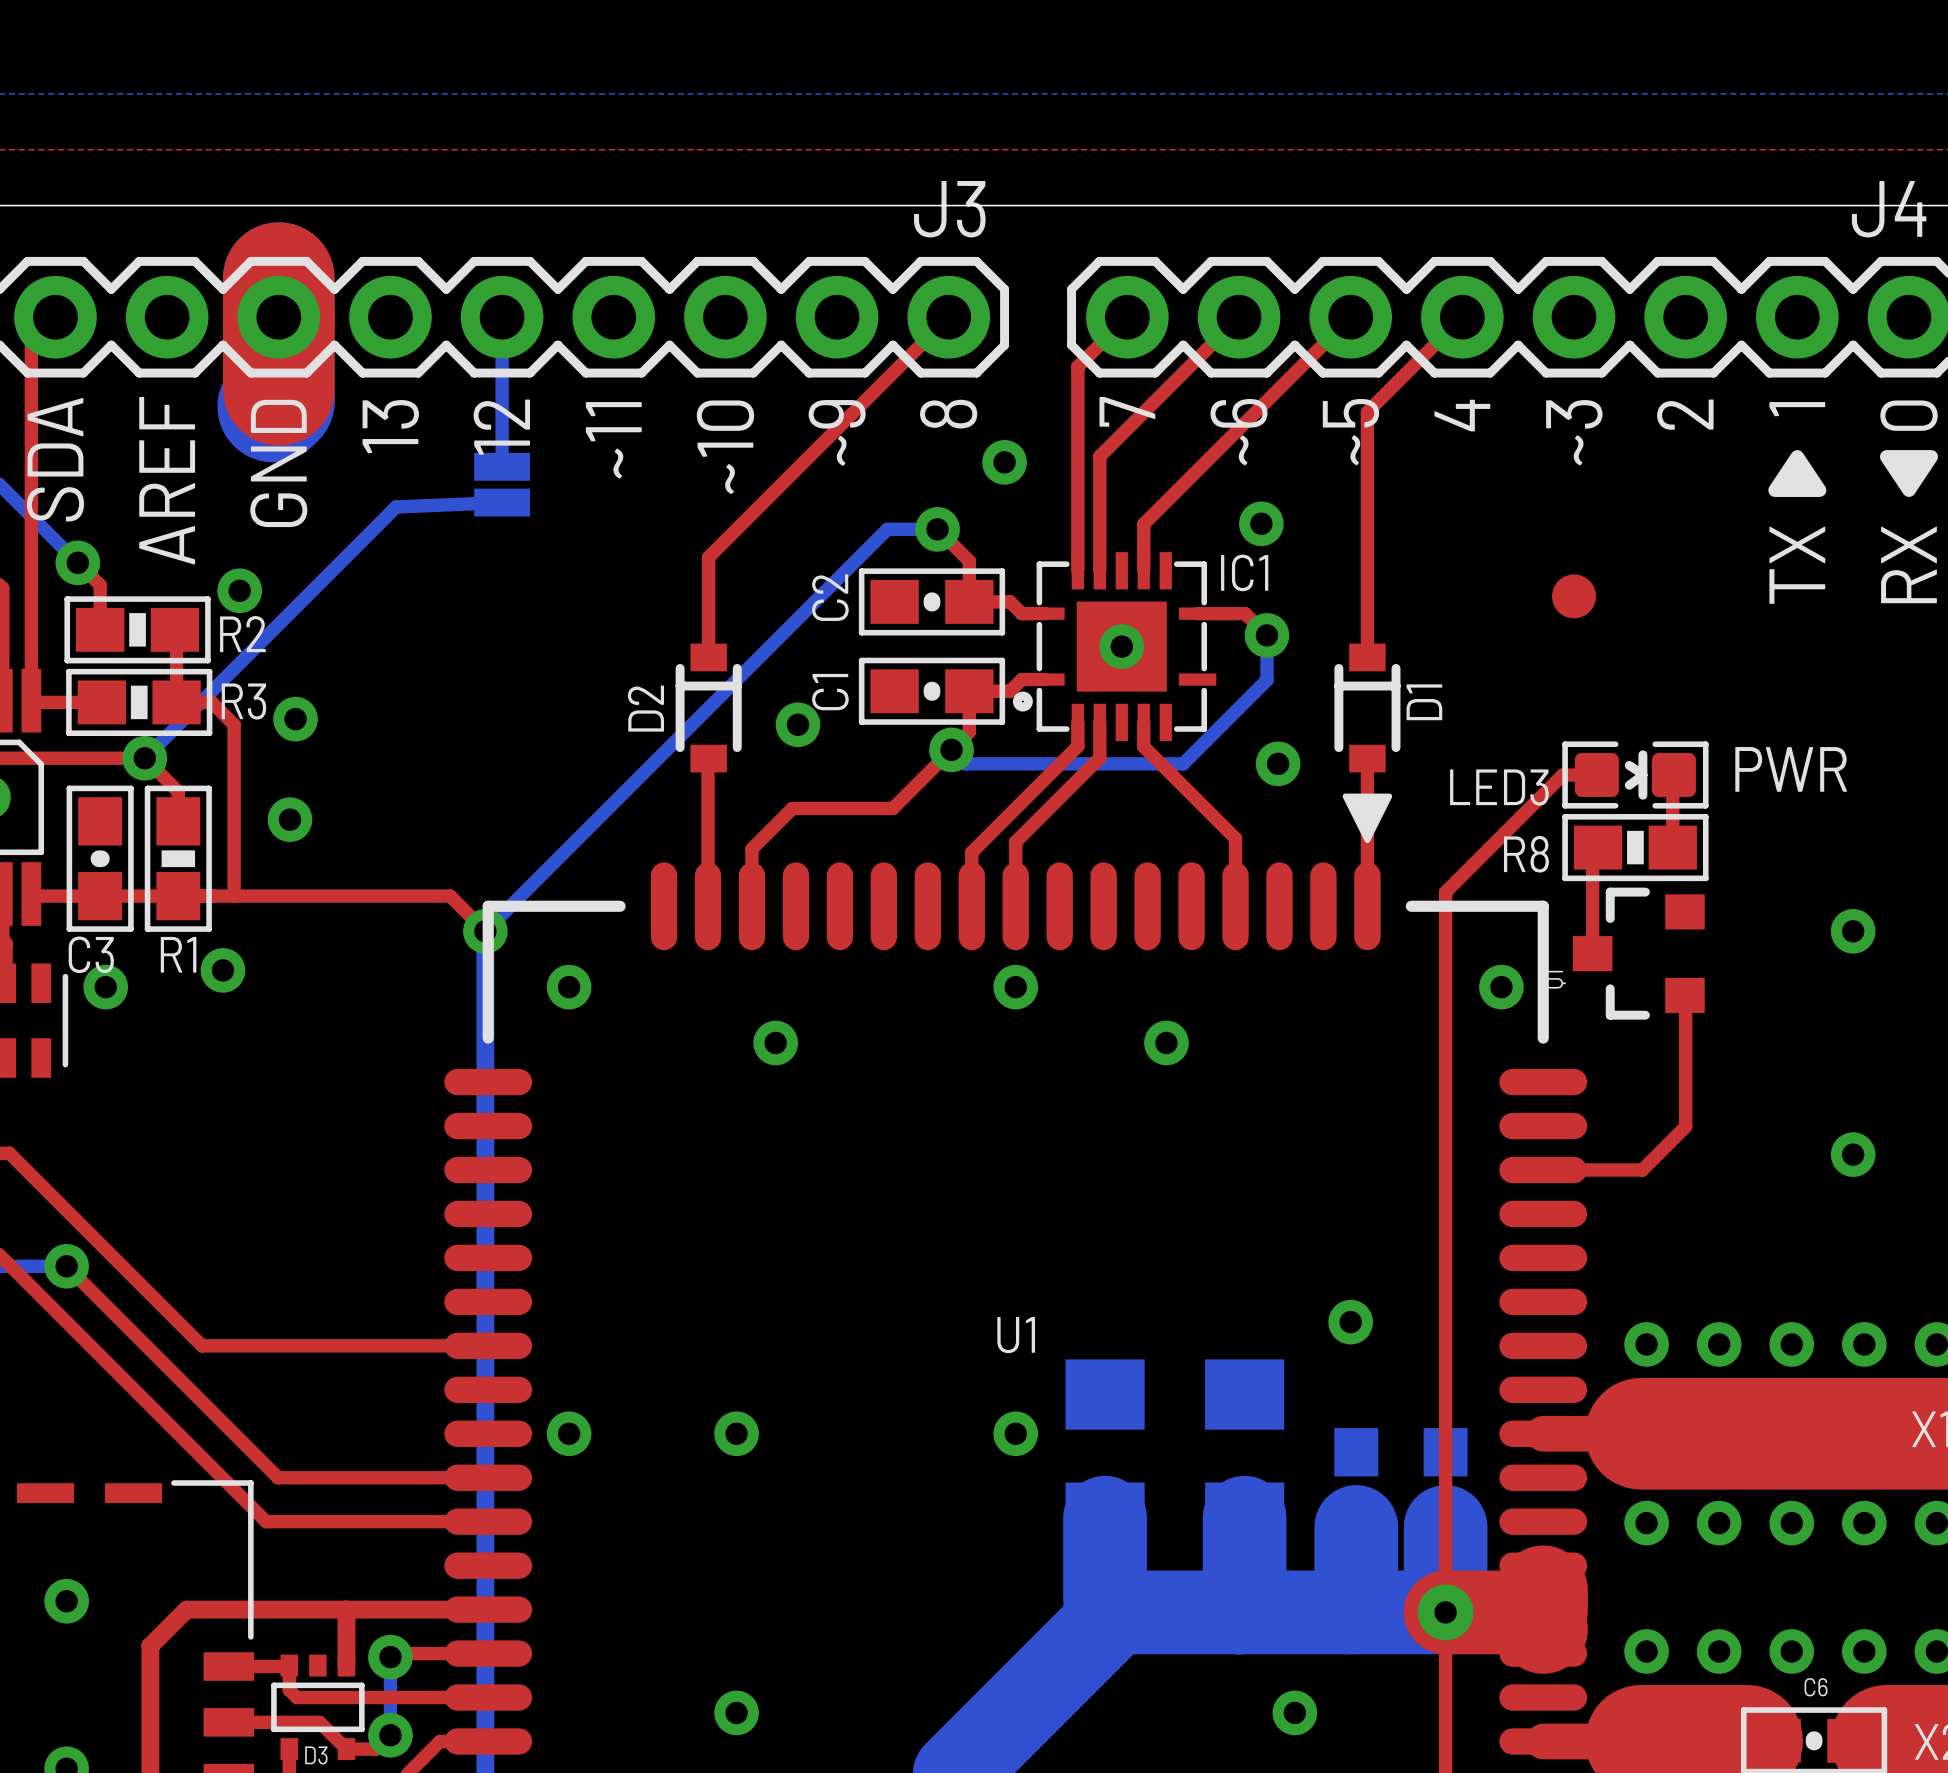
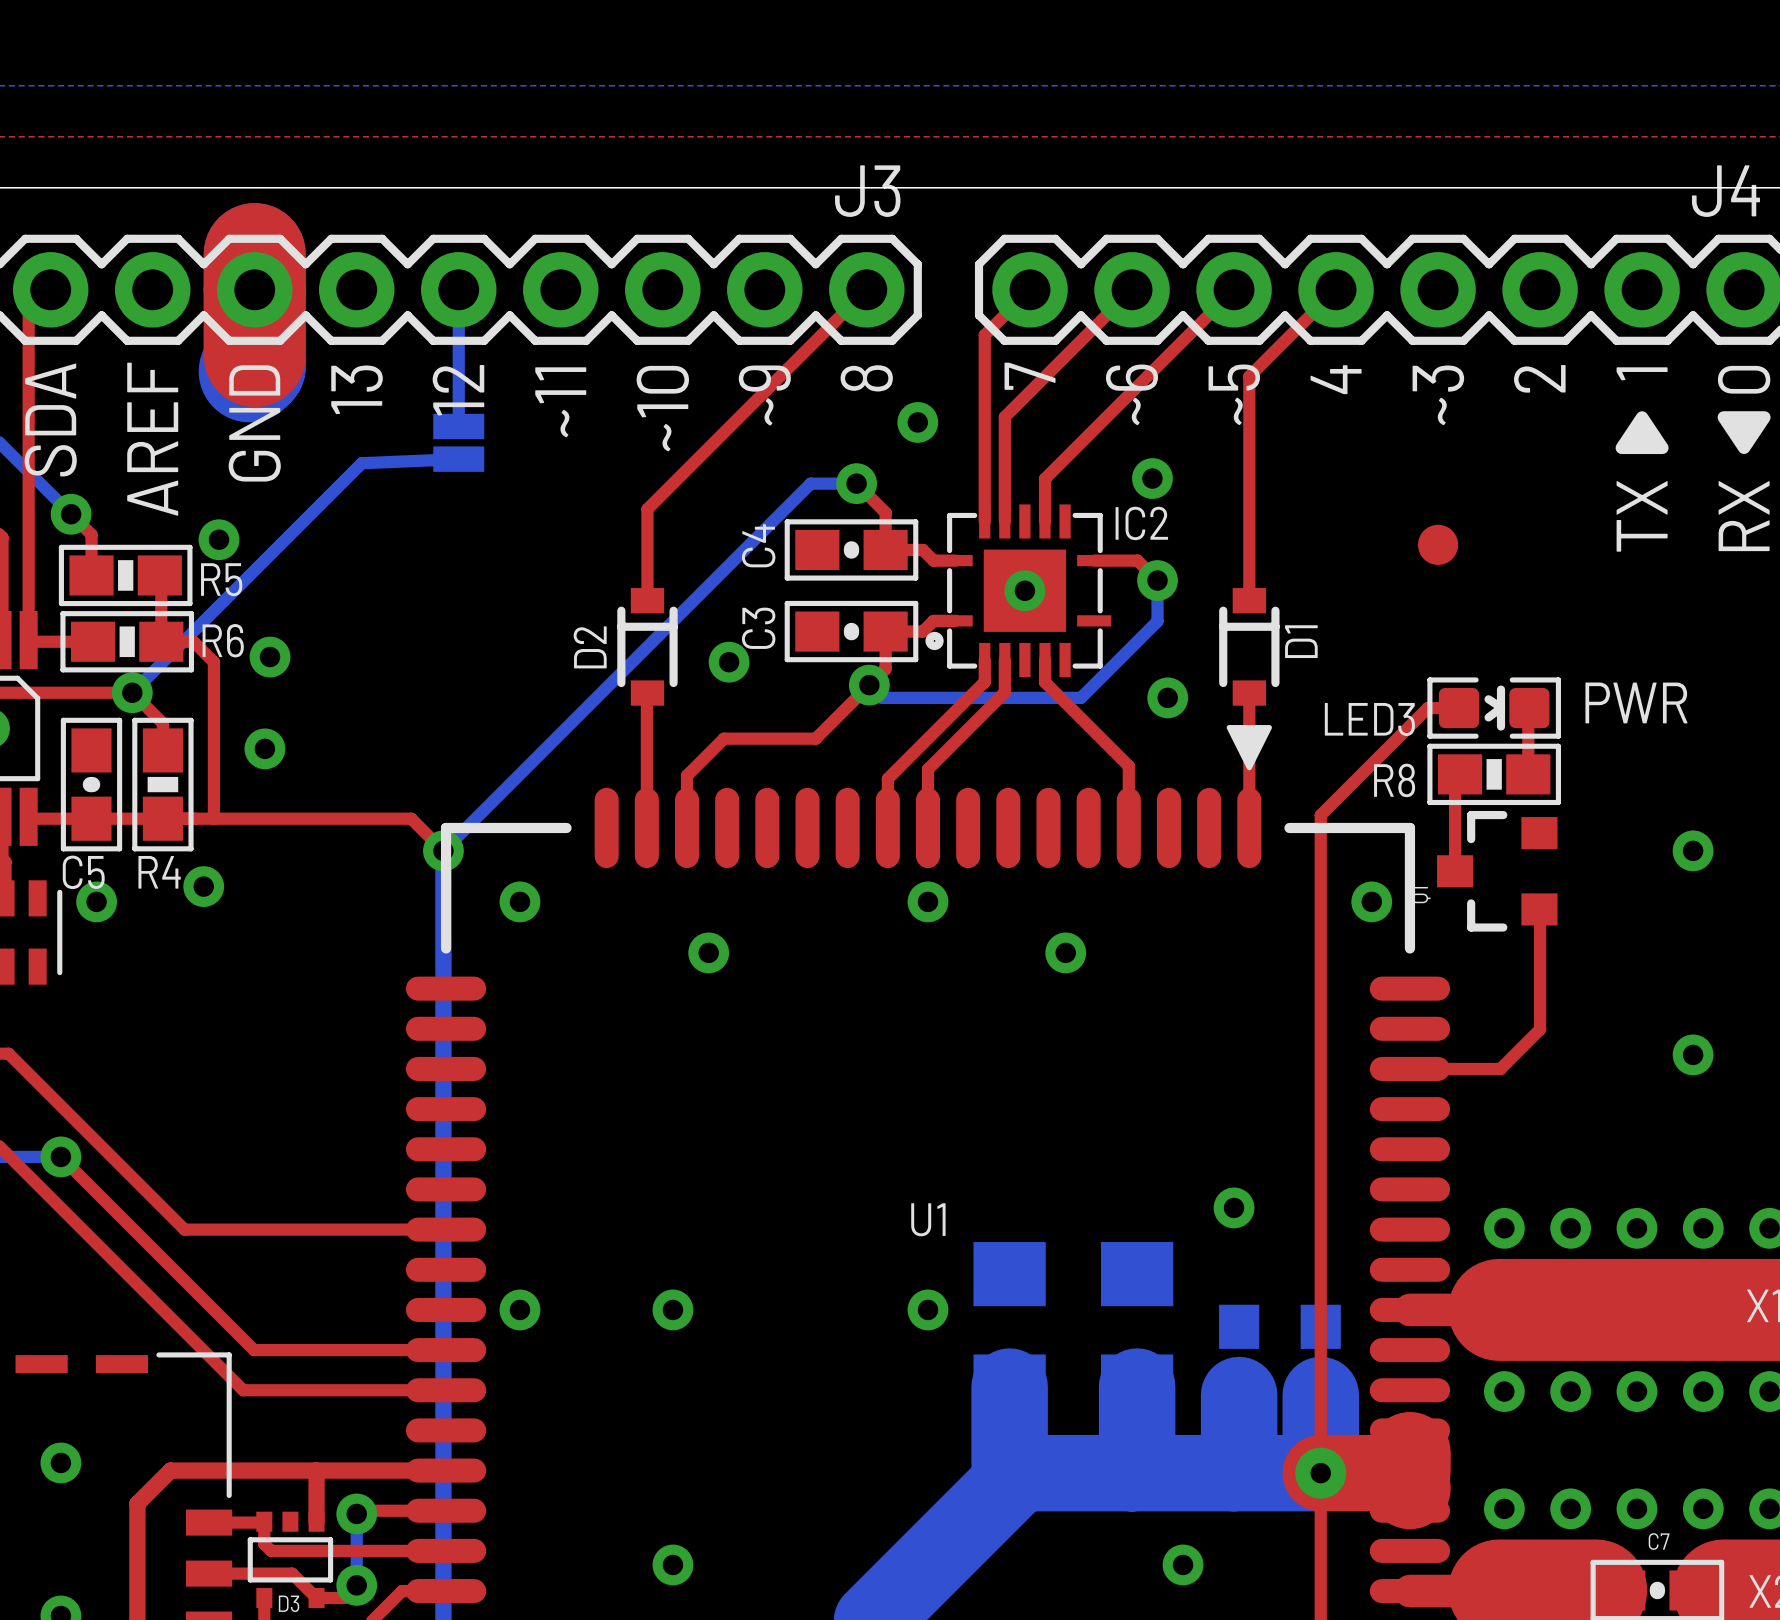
IC1 name: IC1 (1244, 572) -> IC2 (1141, 523)
C2 name: C2 (830, 597) -> C4 (758, 545)
R2 name: R2 (242, 634) -> R5 (221, 579)
C1 name: C1 (830, 692) -> C3 (758, 628)
R3 name: R3 (243, 701) -> R6 (223, 640)
C3 name: C3 (91, 954) -> C5 (83, 872)
R1 name: R1 (178, 954) -> R4 (159, 872)
C6 name: C6 (1816, 1687) -> C7 (1659, 1541)

